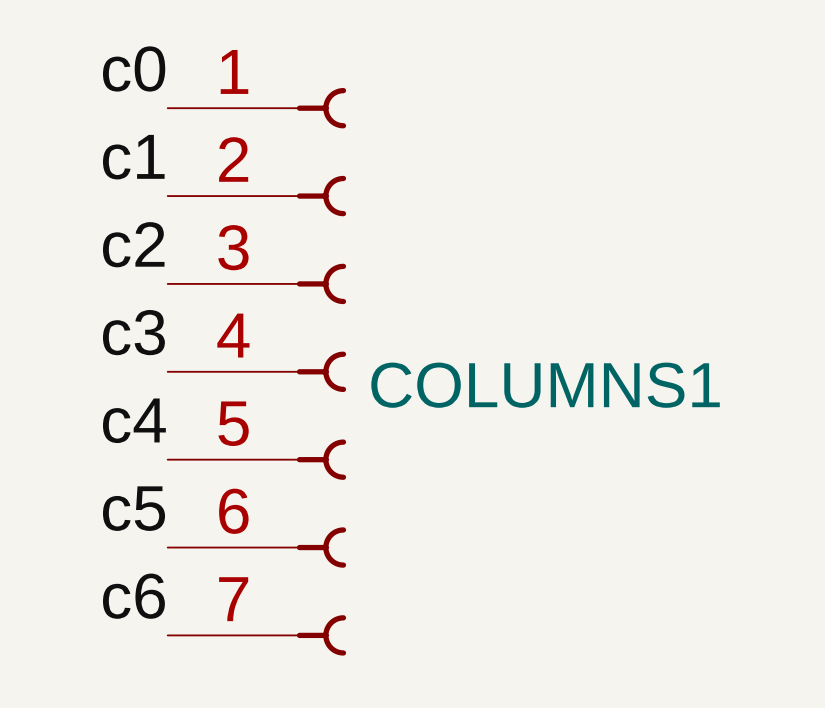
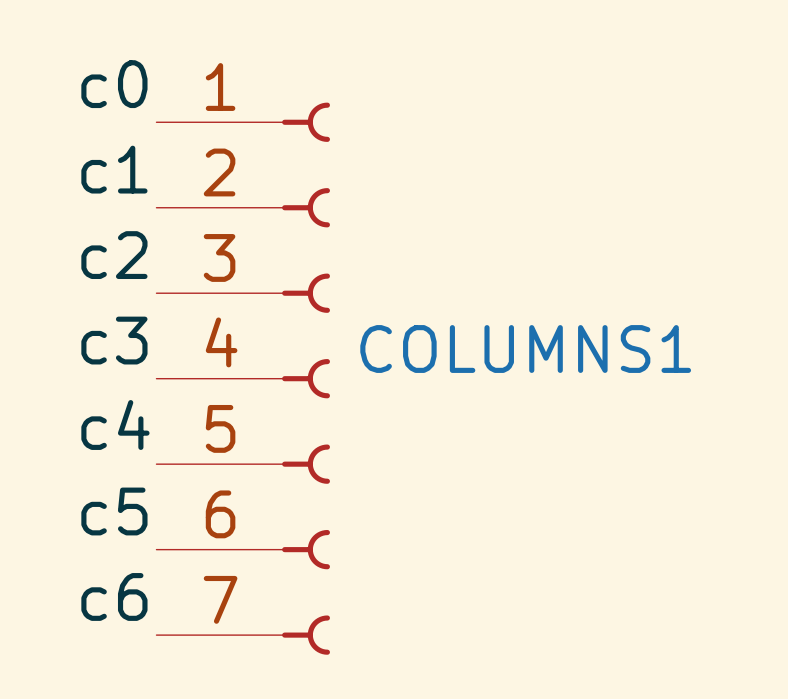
COLUMNS1 name position: COLUMNS1 (545, 385) -> COLUMNS1 (525, 349)

